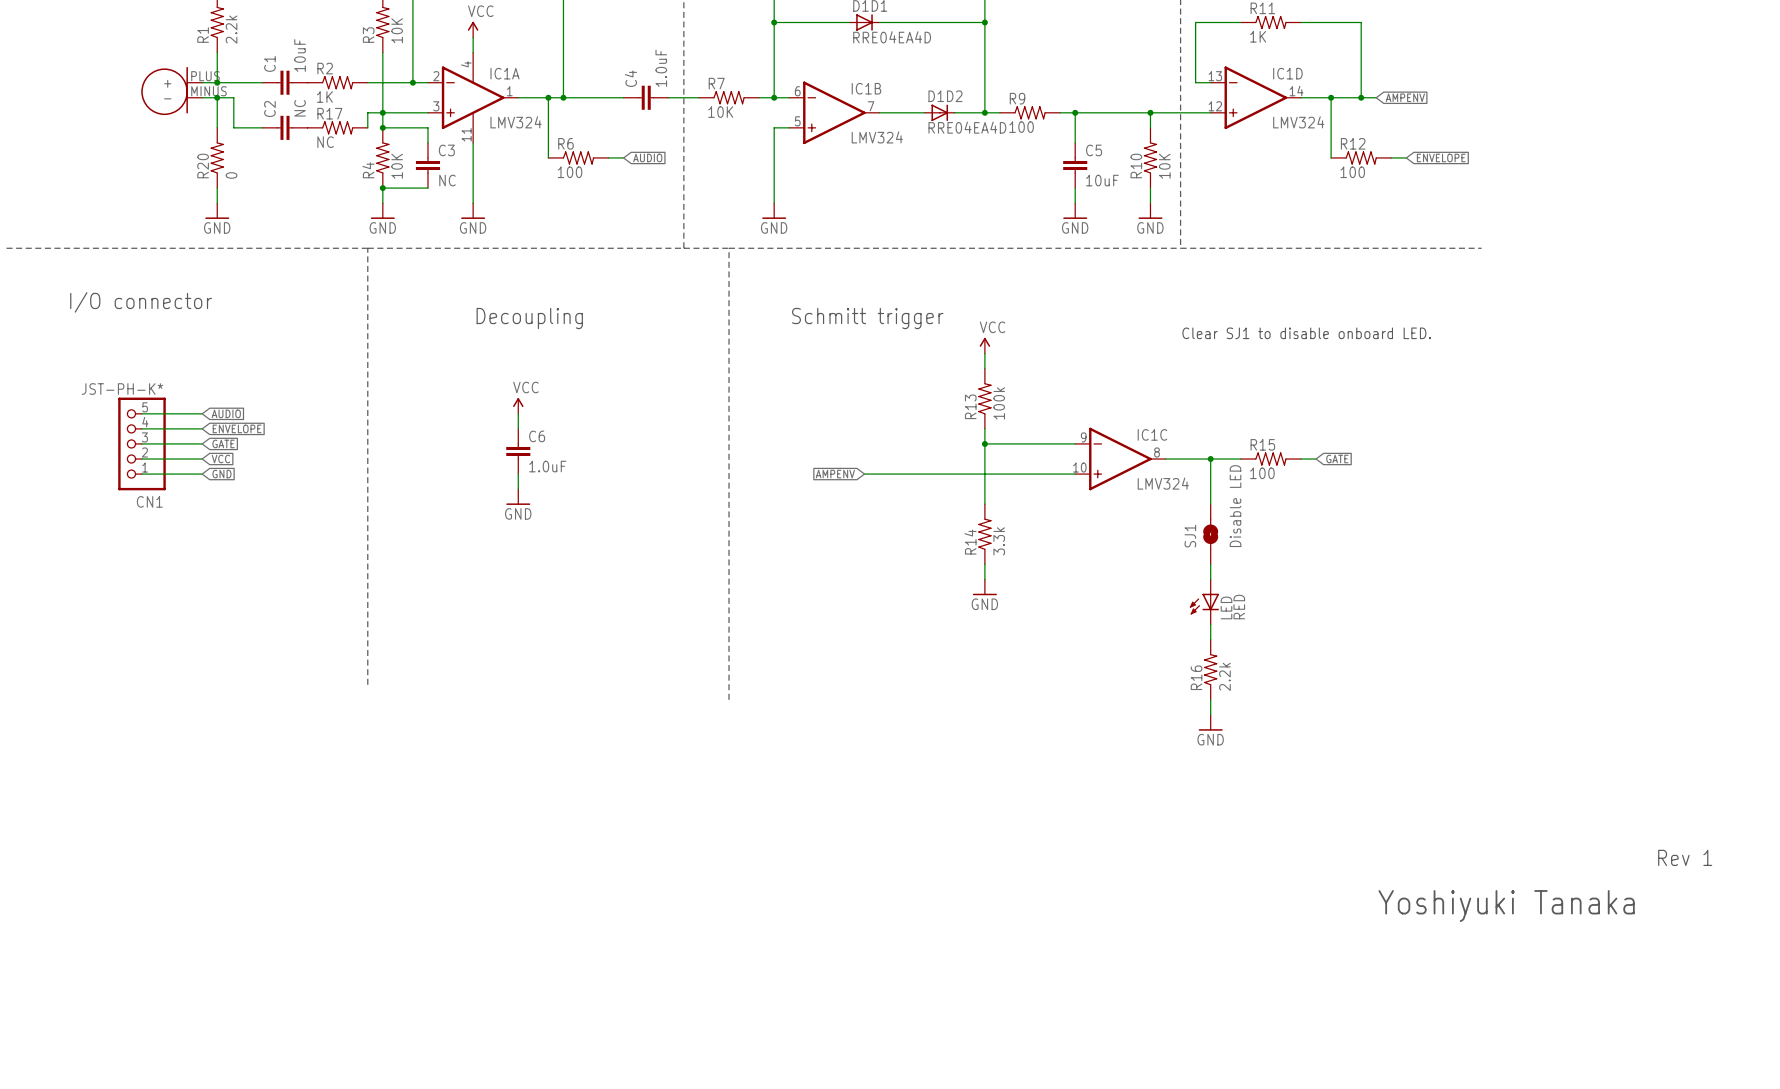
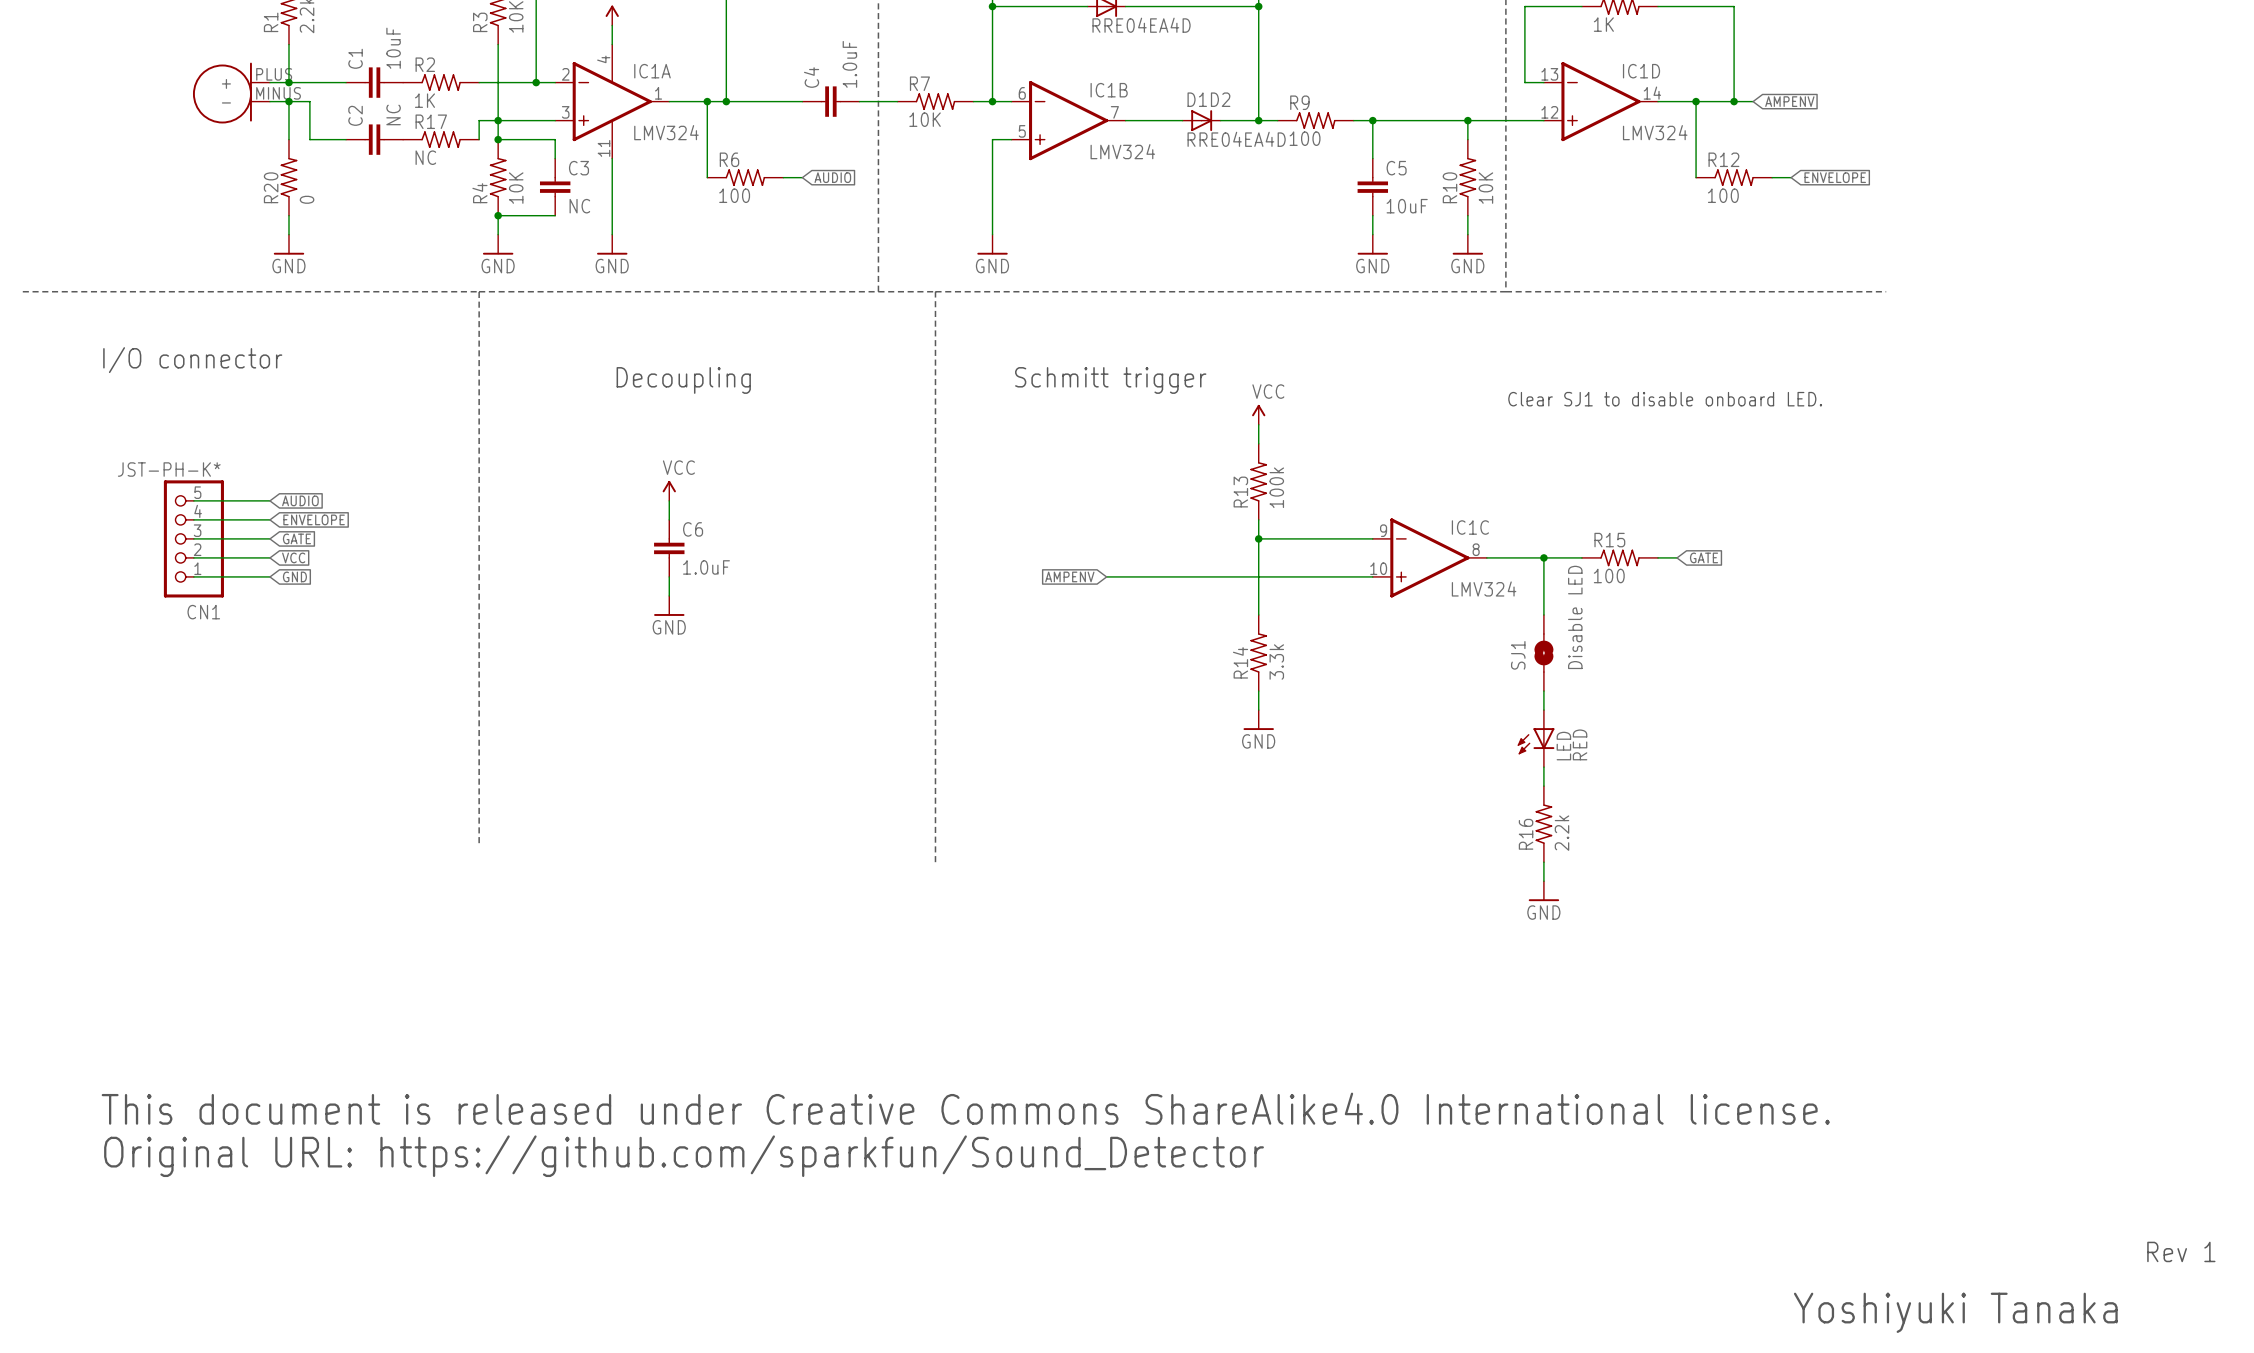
text: Rev 1 (1685, 857) -> none
text: none -> This document is released under Creative Commons ShareAlike4.0 International license. (965, 1108)
text: Yoshiyuki Tanaka (1506, 906) -> none
text: none -> Original URL: https://github.com/sparkfun/Sound_Detector (684, 1156)
text: none -> Rev 1 (2181, 1251)
text: none -> Yoshiyuki Tanaka (1955, 1312)

